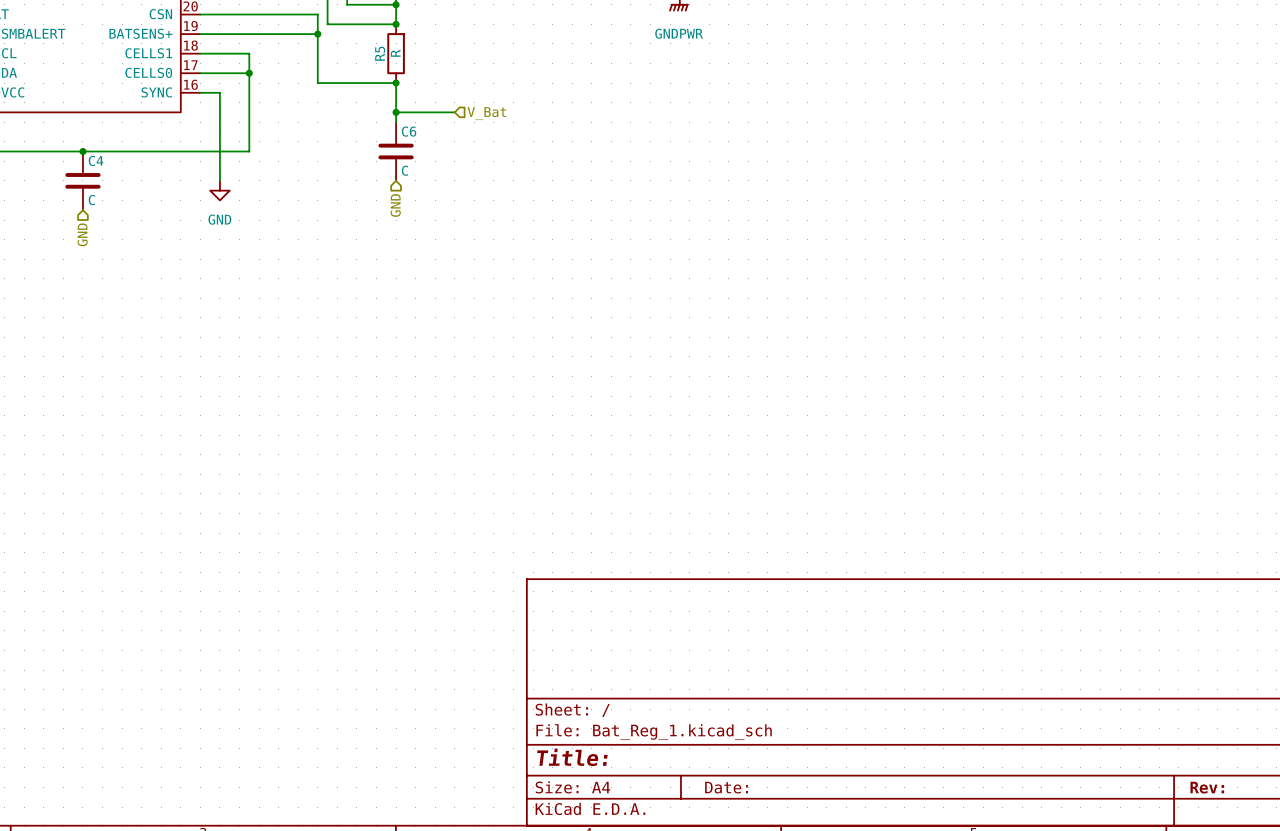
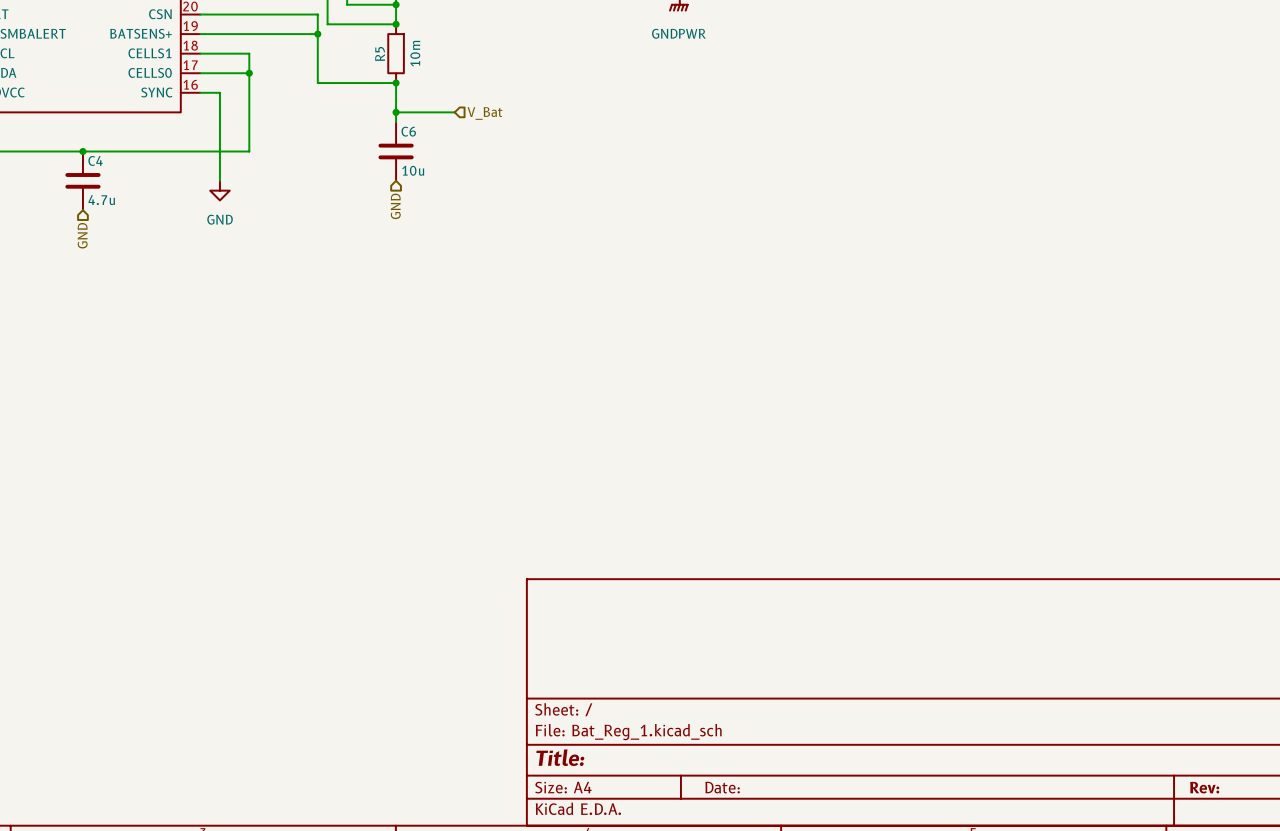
R5 value: R (395, 53) -> 10m (415, 53)
C6 value: C (404, 170) -> 10u (413, 170)
C4 value: C (91, 200) -> 4.7u (101, 200)

